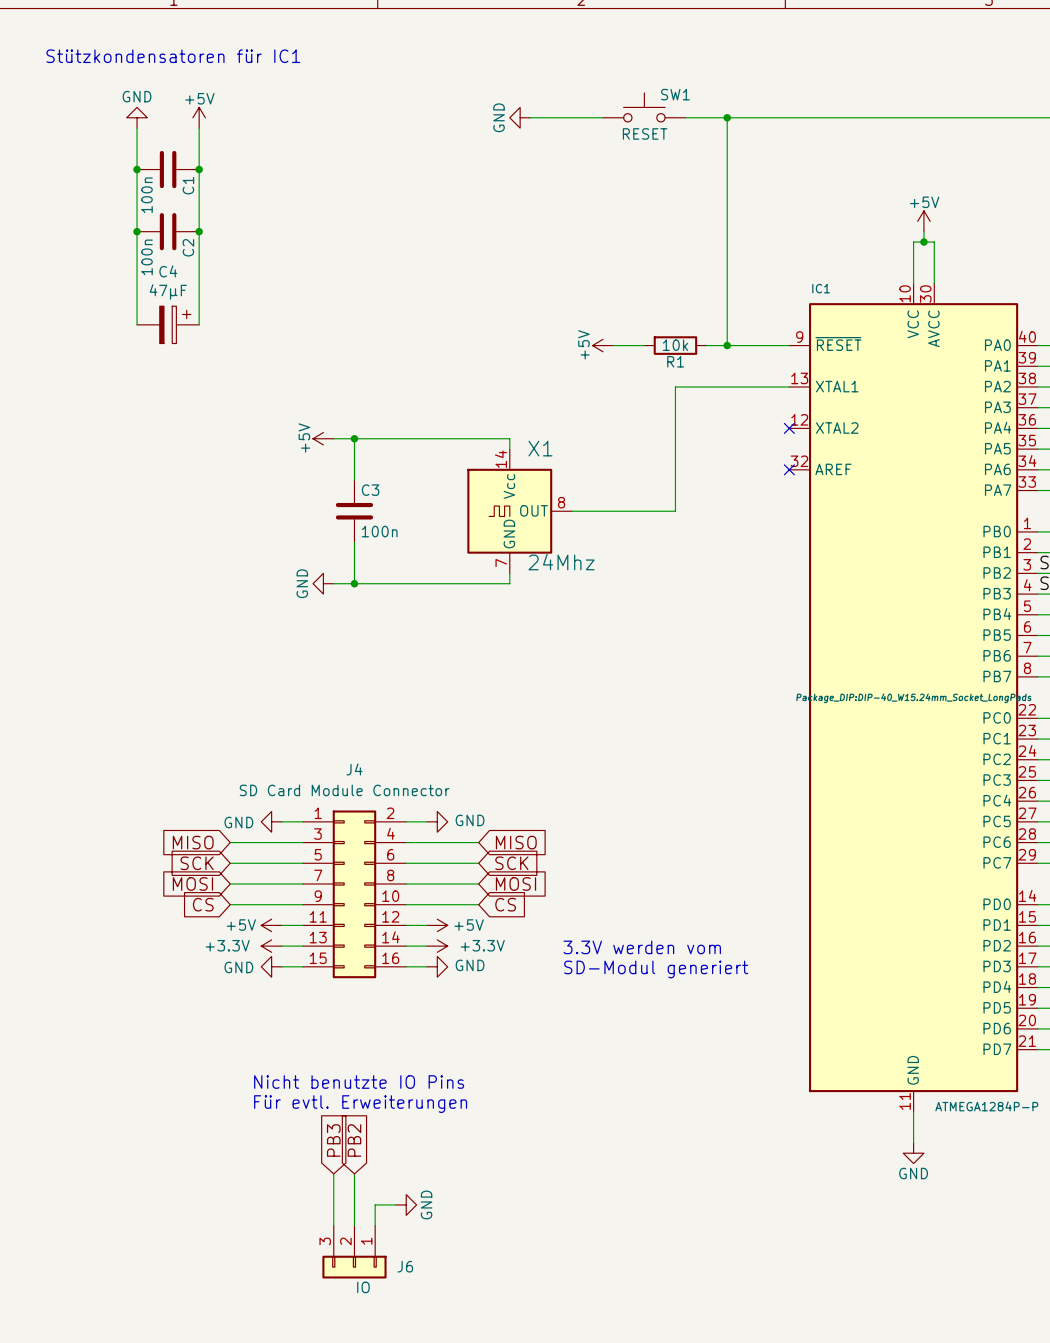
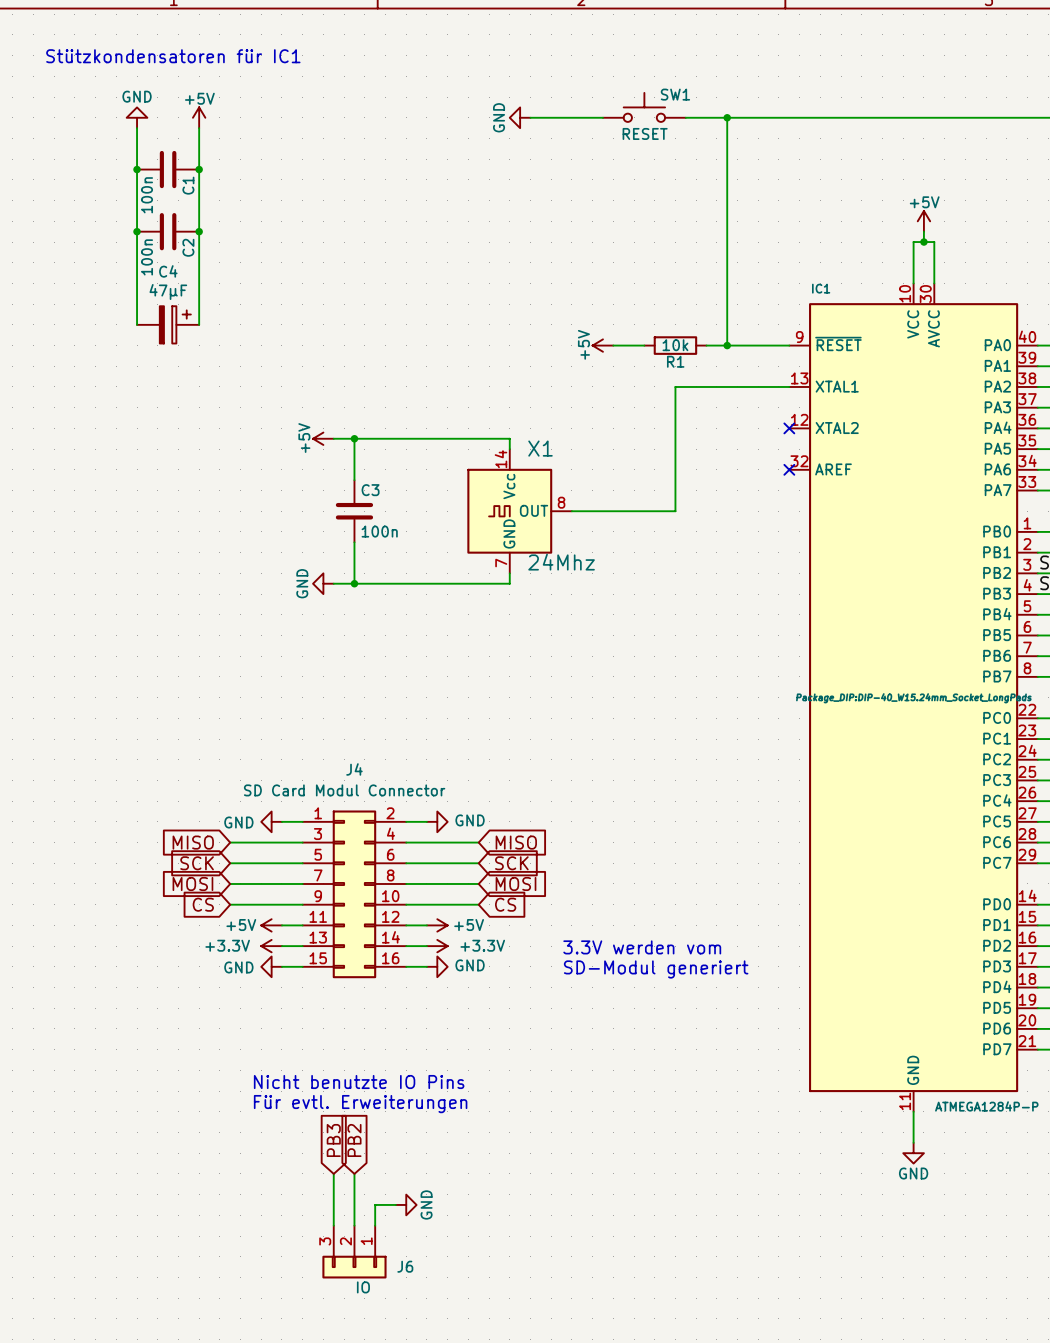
J4 value: SD Card Module Connector (344, 790) -> SD Card Modul Connector (344, 790)

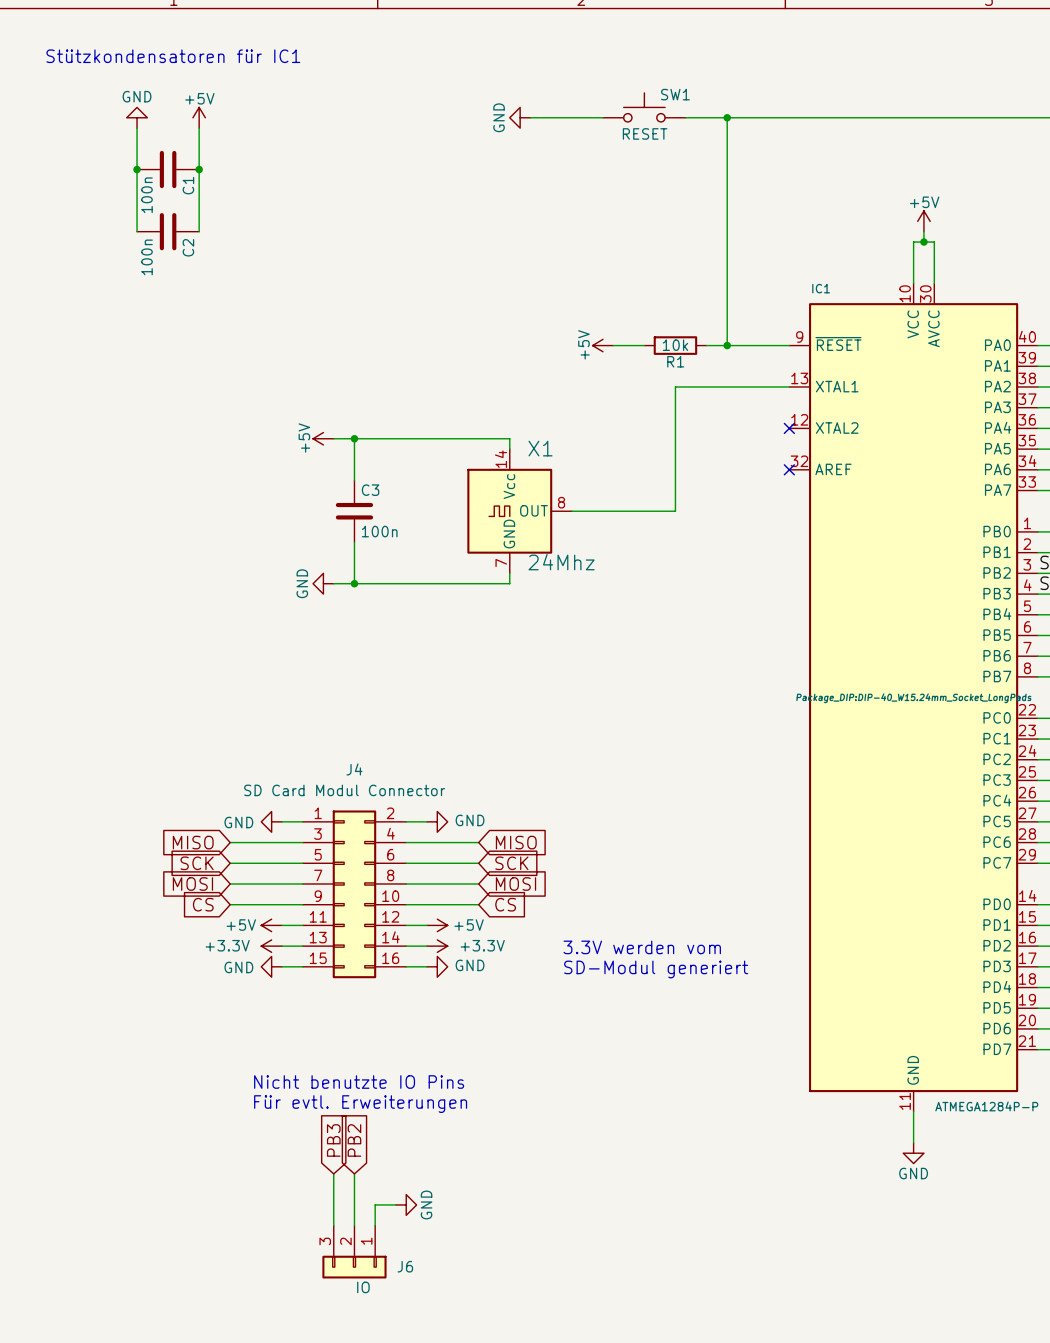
wire: (137, 231) (137, 324) -> none
junction: (137, 231) -> none
wire: (199, 231) (199, 324) -> none
junction: (199, 231) -> none
C4: 47µF (168, 324) -> none

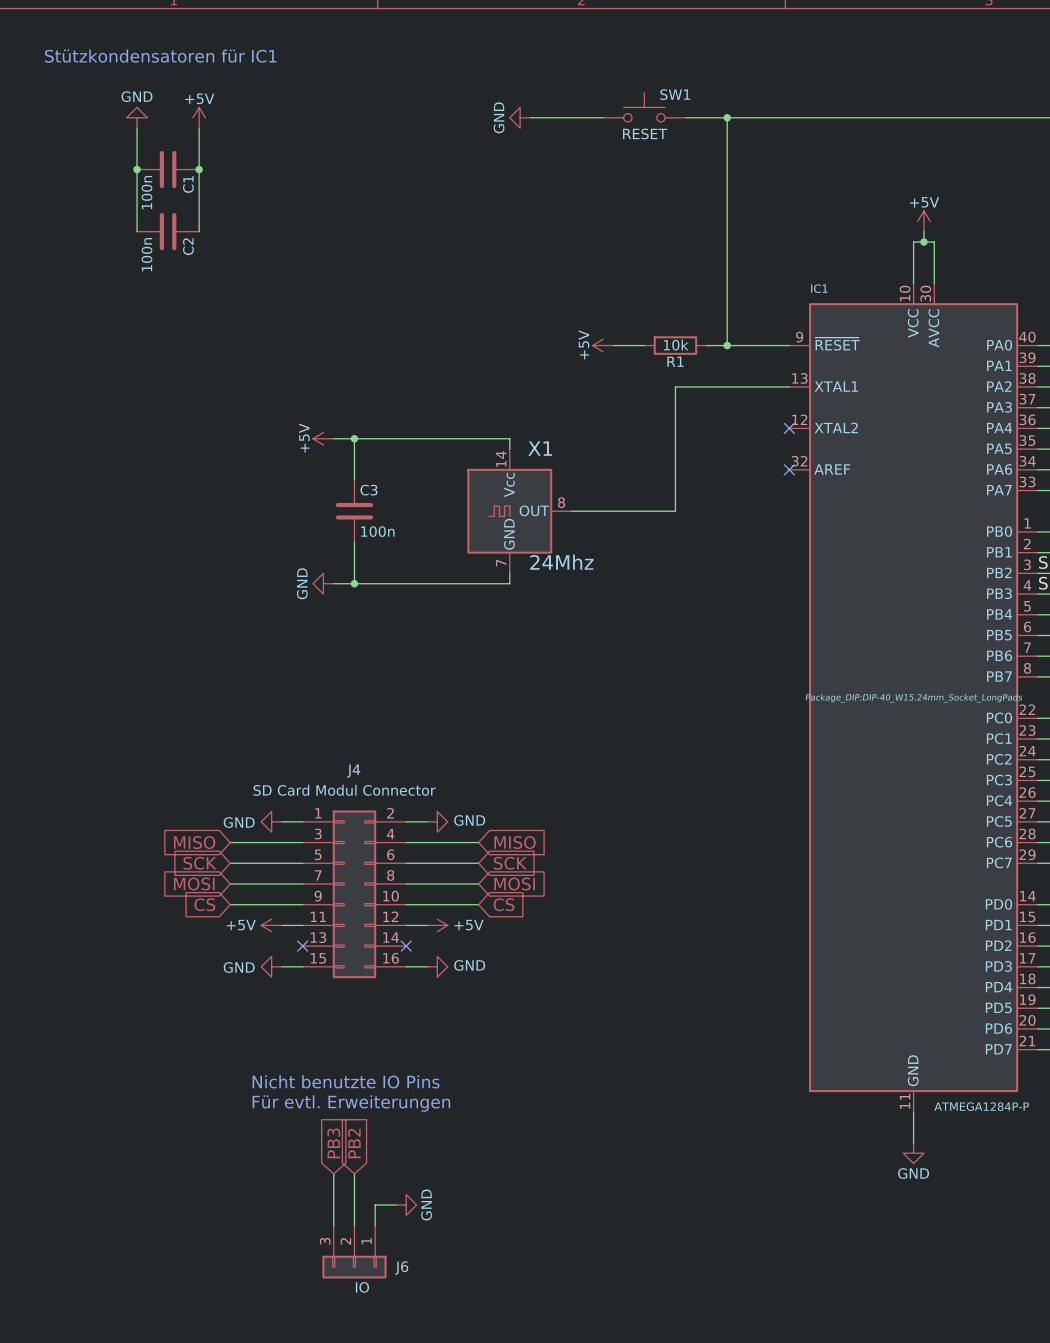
power symbol: +3.3V (271, 946) -> none
wire: (281, 946) (302, 946) -> none
no-connect mark: none -> (302, 946)
wire: (406, 946) (426, 946) -> none
no-connect mark: none -> (406, 946)
power symbol: +3.3V (437, 946) -> none
text: 3.3V werden vom (642, 947) -> none
text: SD-Modul generiert (656, 969) -> none

